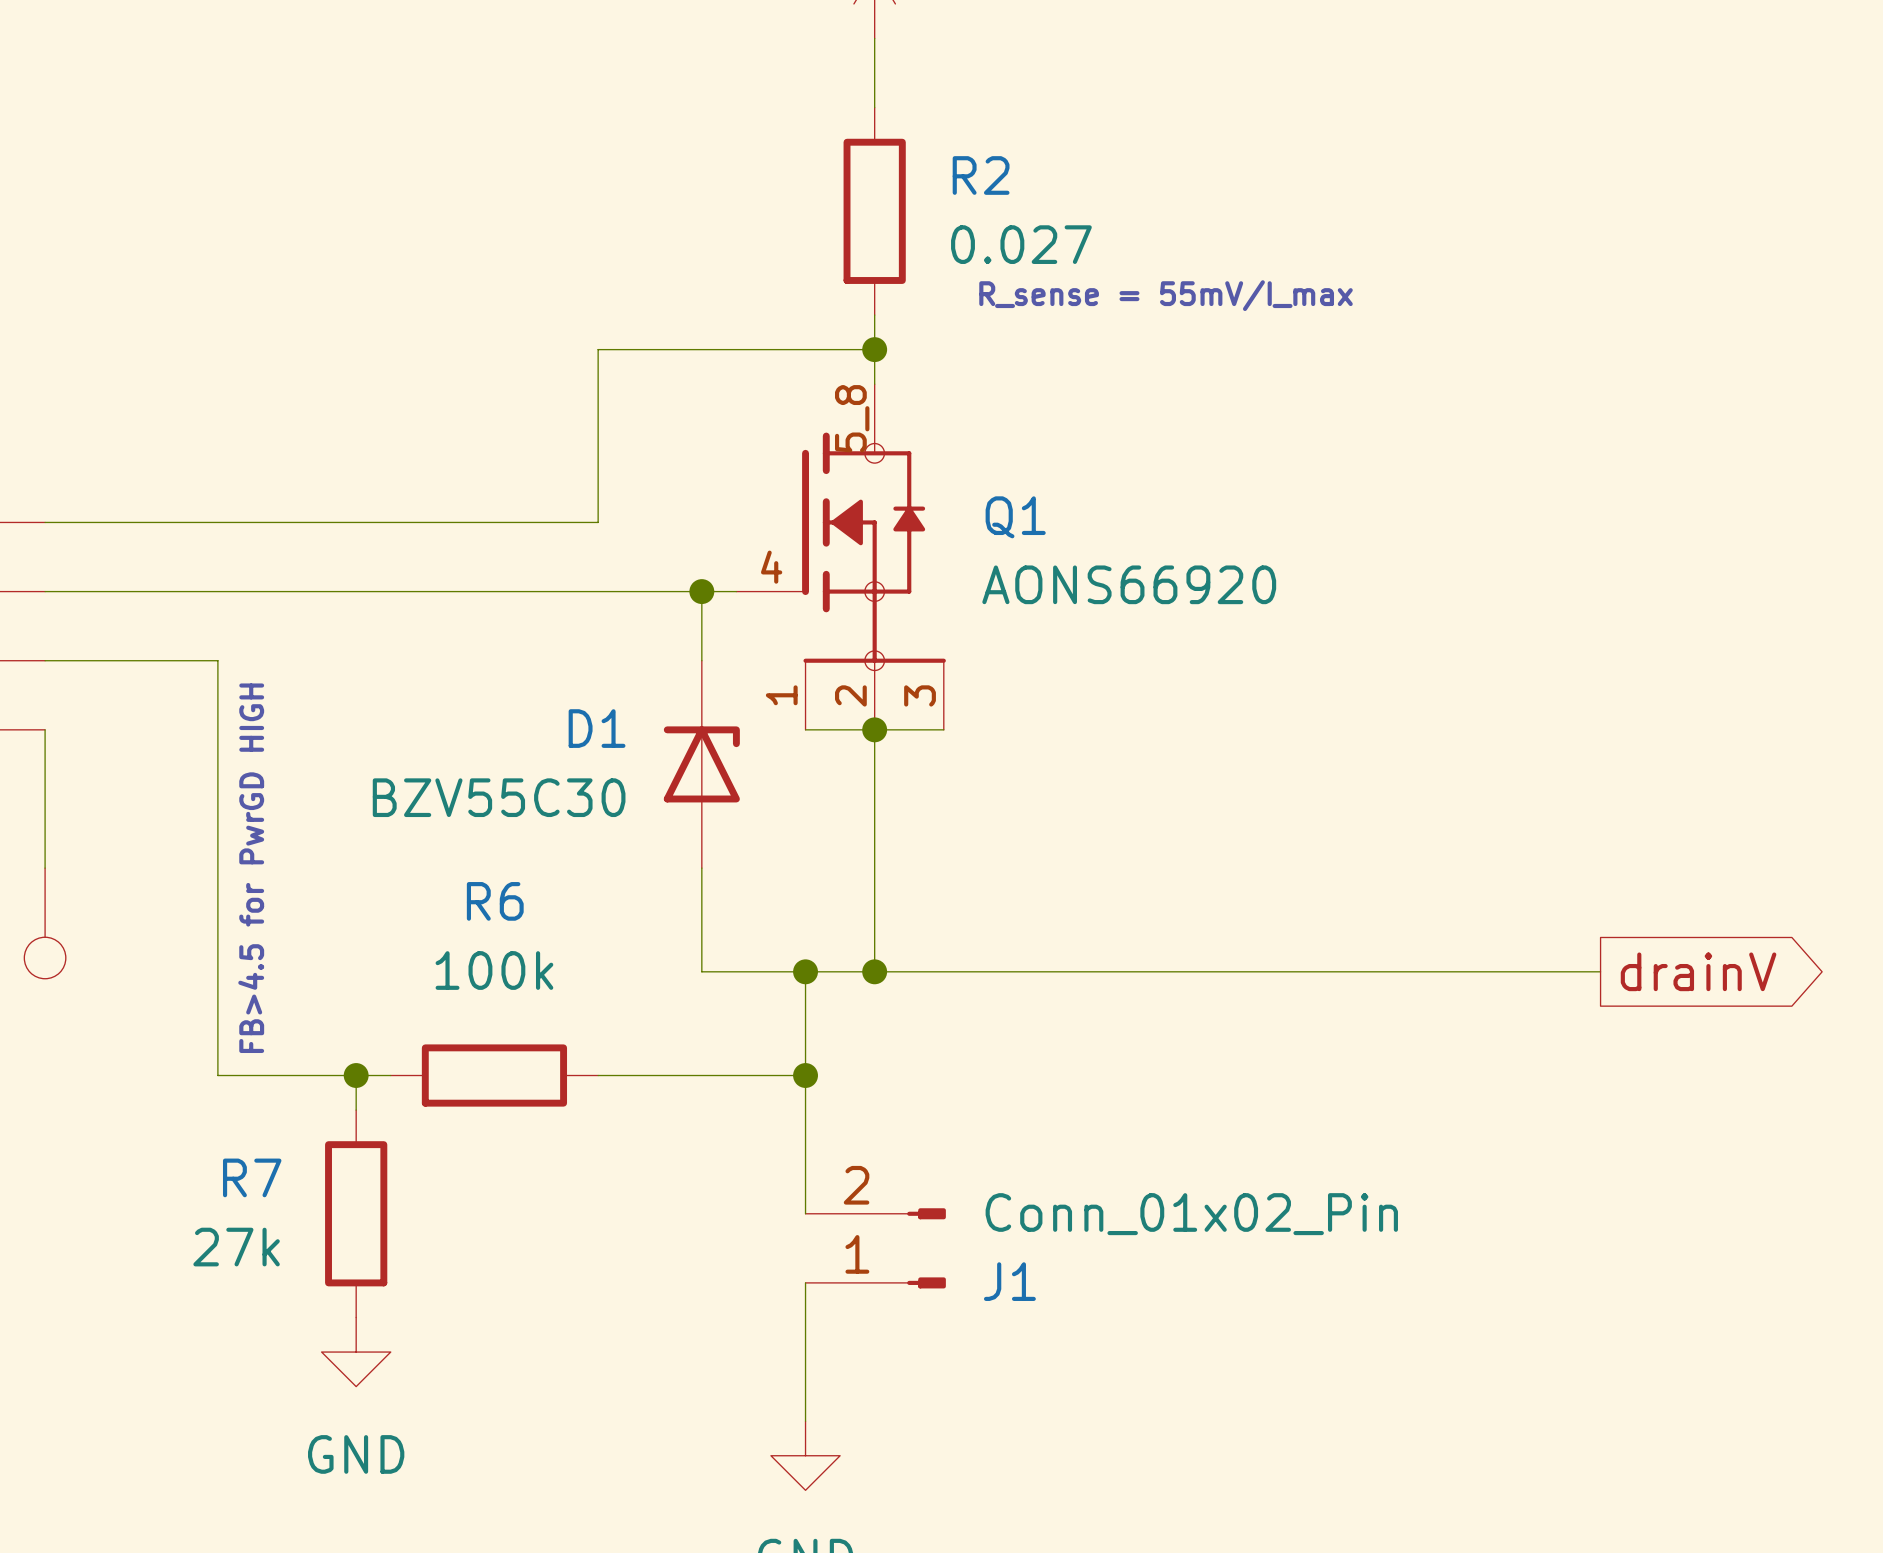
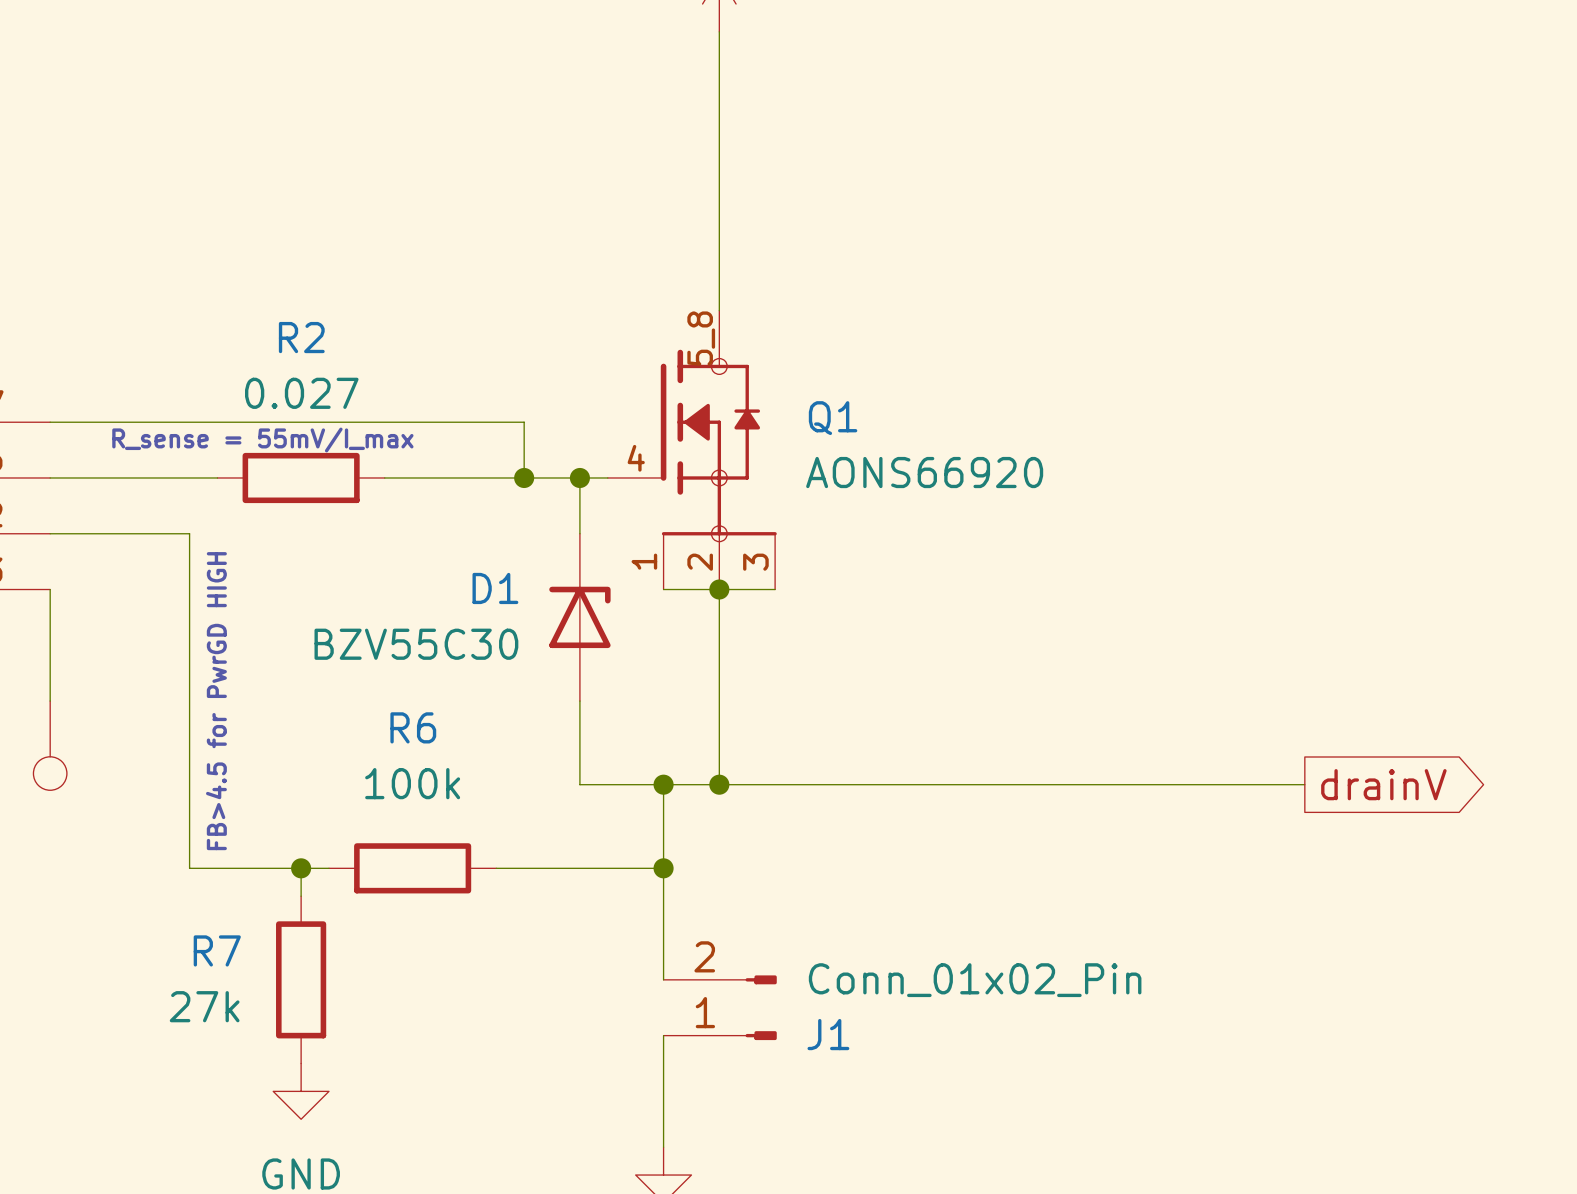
wire: none -> (719, 87) (719, 254)
R2 name position: R2 (981, 175) -> R2 (301, 337)
R2 rotation: 0° (874, 211) -> 90° clockwise (301, 477)
R2 position: (874, 211) -> (301, 477)
R2 value position: 0.027 (1021, 244) -> 0.027 (301, 393)
text: R_sense = 55mV/I_max (1166, 295) -> none
wire: (874, 349) (598, 349) (598, 522) -> (524, 477) (524, 422) (496, 422)
junction: (874, 349) -> none
text: none -> R_sense = 55mV/I_max (262, 440)
wire: (252, 591) (459, 591) -> none
junction: none -> (524, 477)

